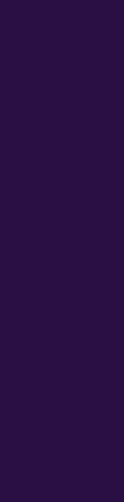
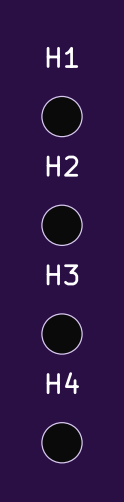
H1: none -> (62, 116)
H2: none -> (62, 225)
H3: none -> (62, 334)
H4: none -> (62, 442)

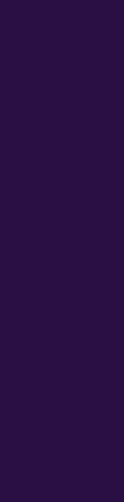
H1: (62, 116) -> none
H2: (62, 225) -> none
H3: (62, 334) -> none
H4: (62, 442) -> none

